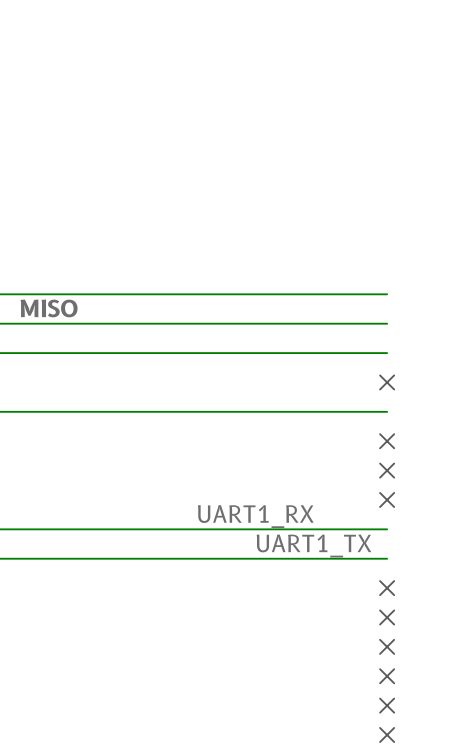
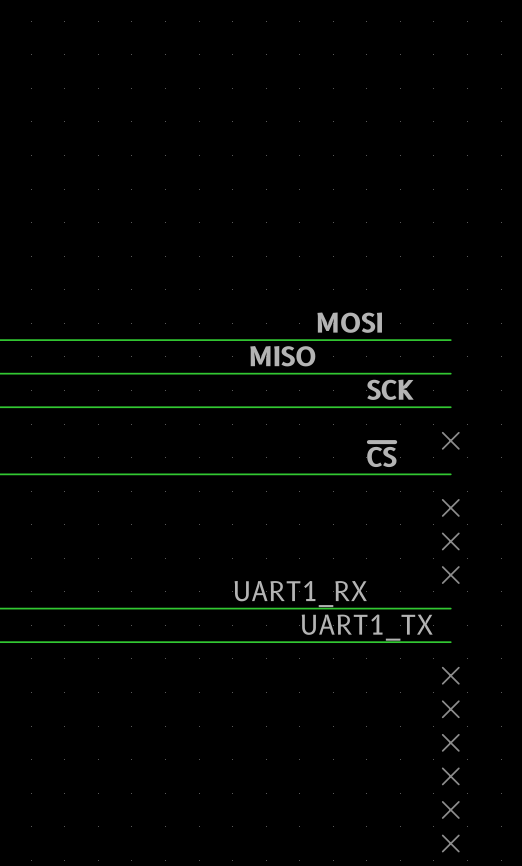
label: none -> MOSI (349, 322)
label position: MISO (49, 308) -> MISO (282, 356)
label: none -> SCK (390, 389)
label: none -> ~{CS} (381, 454)

